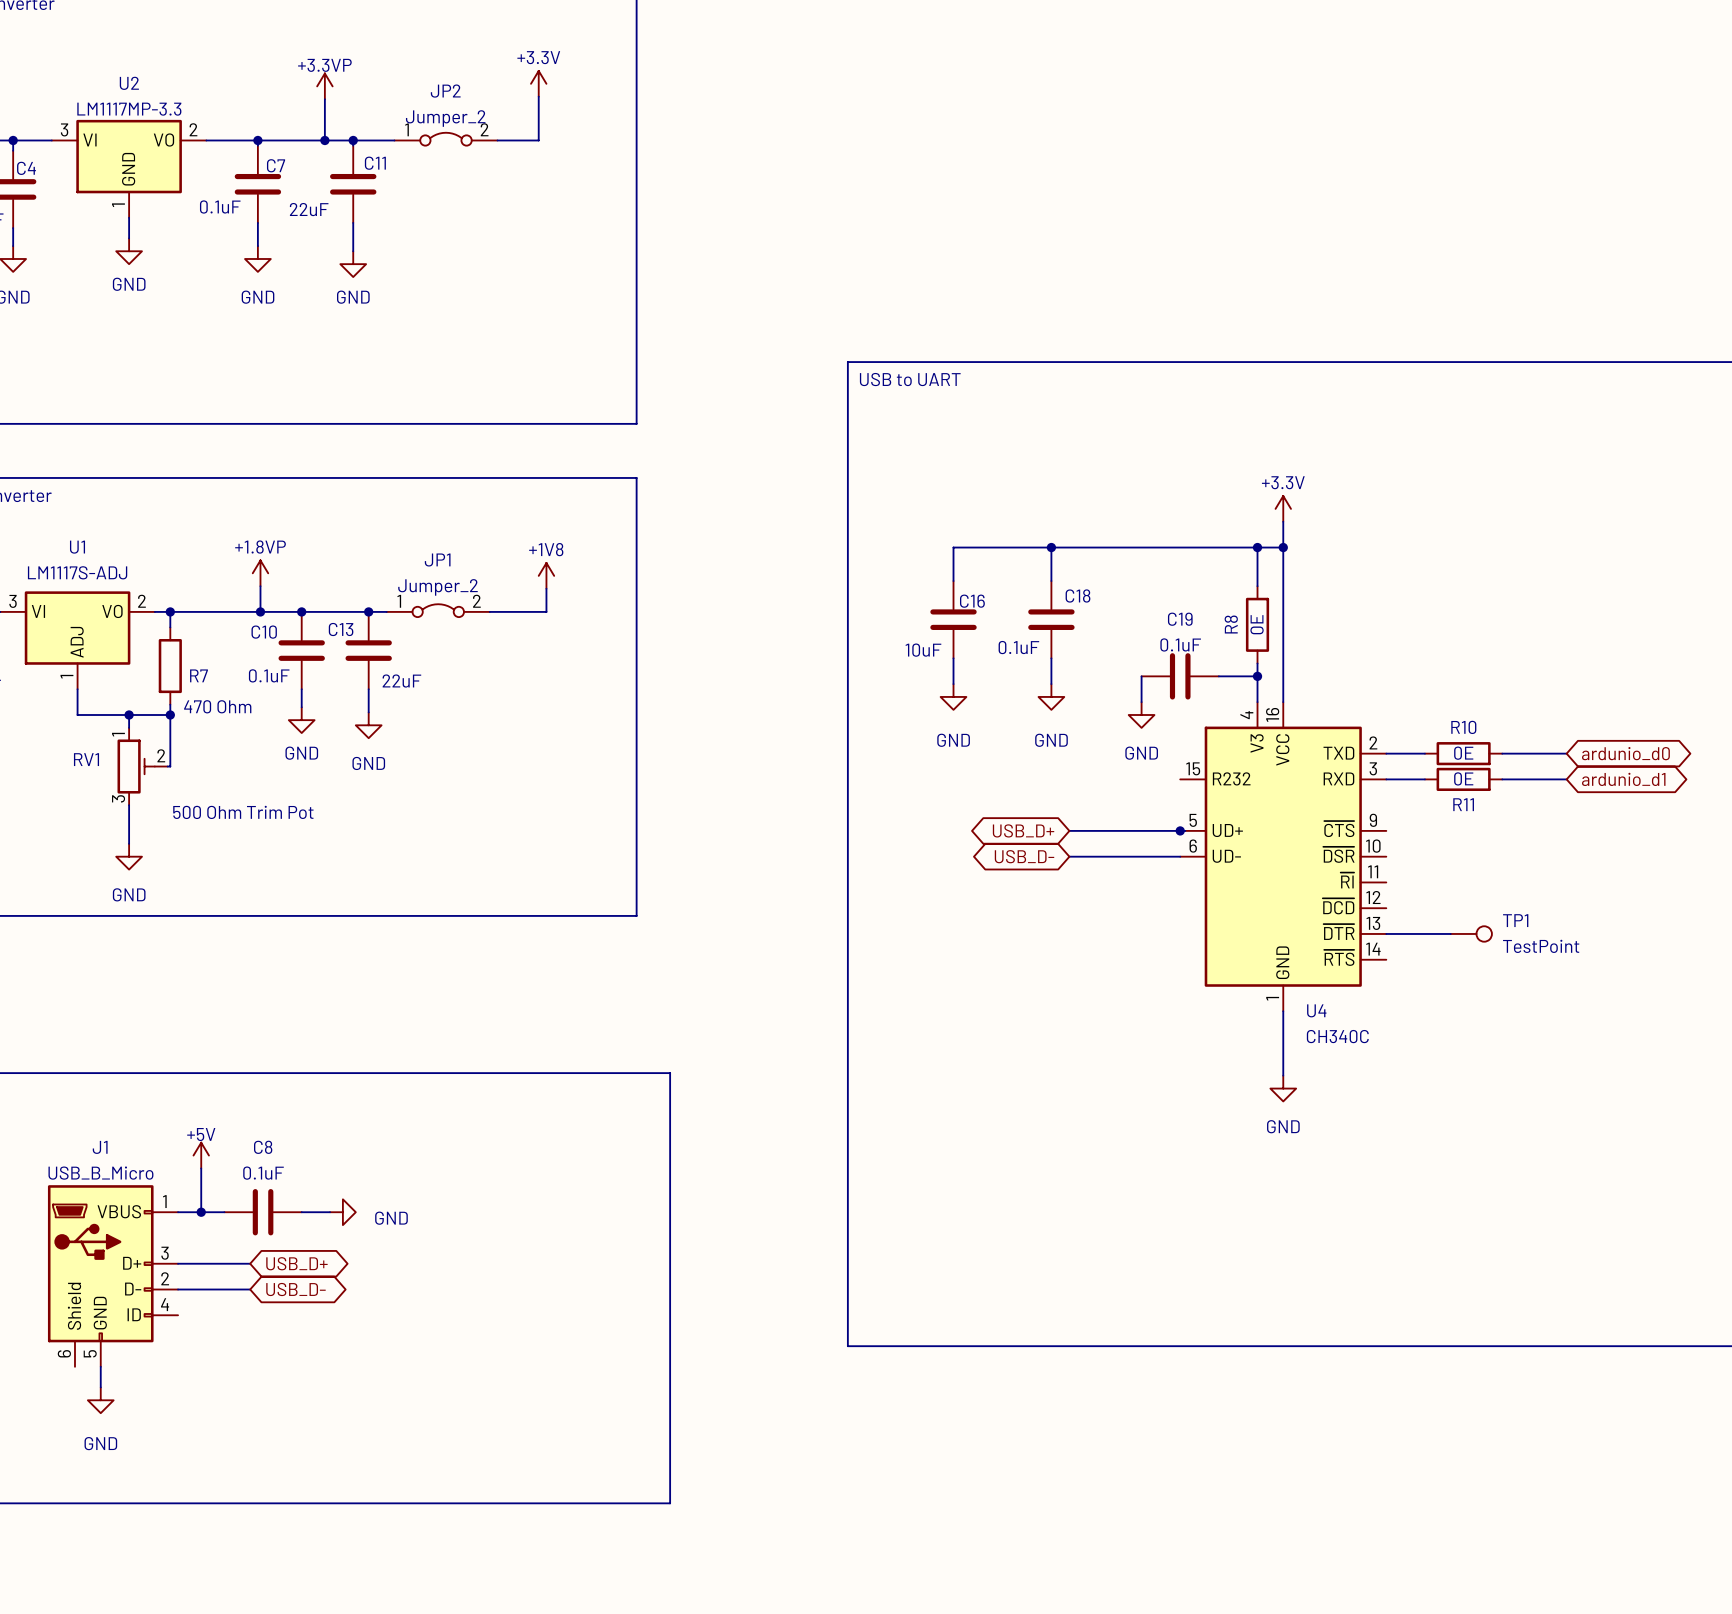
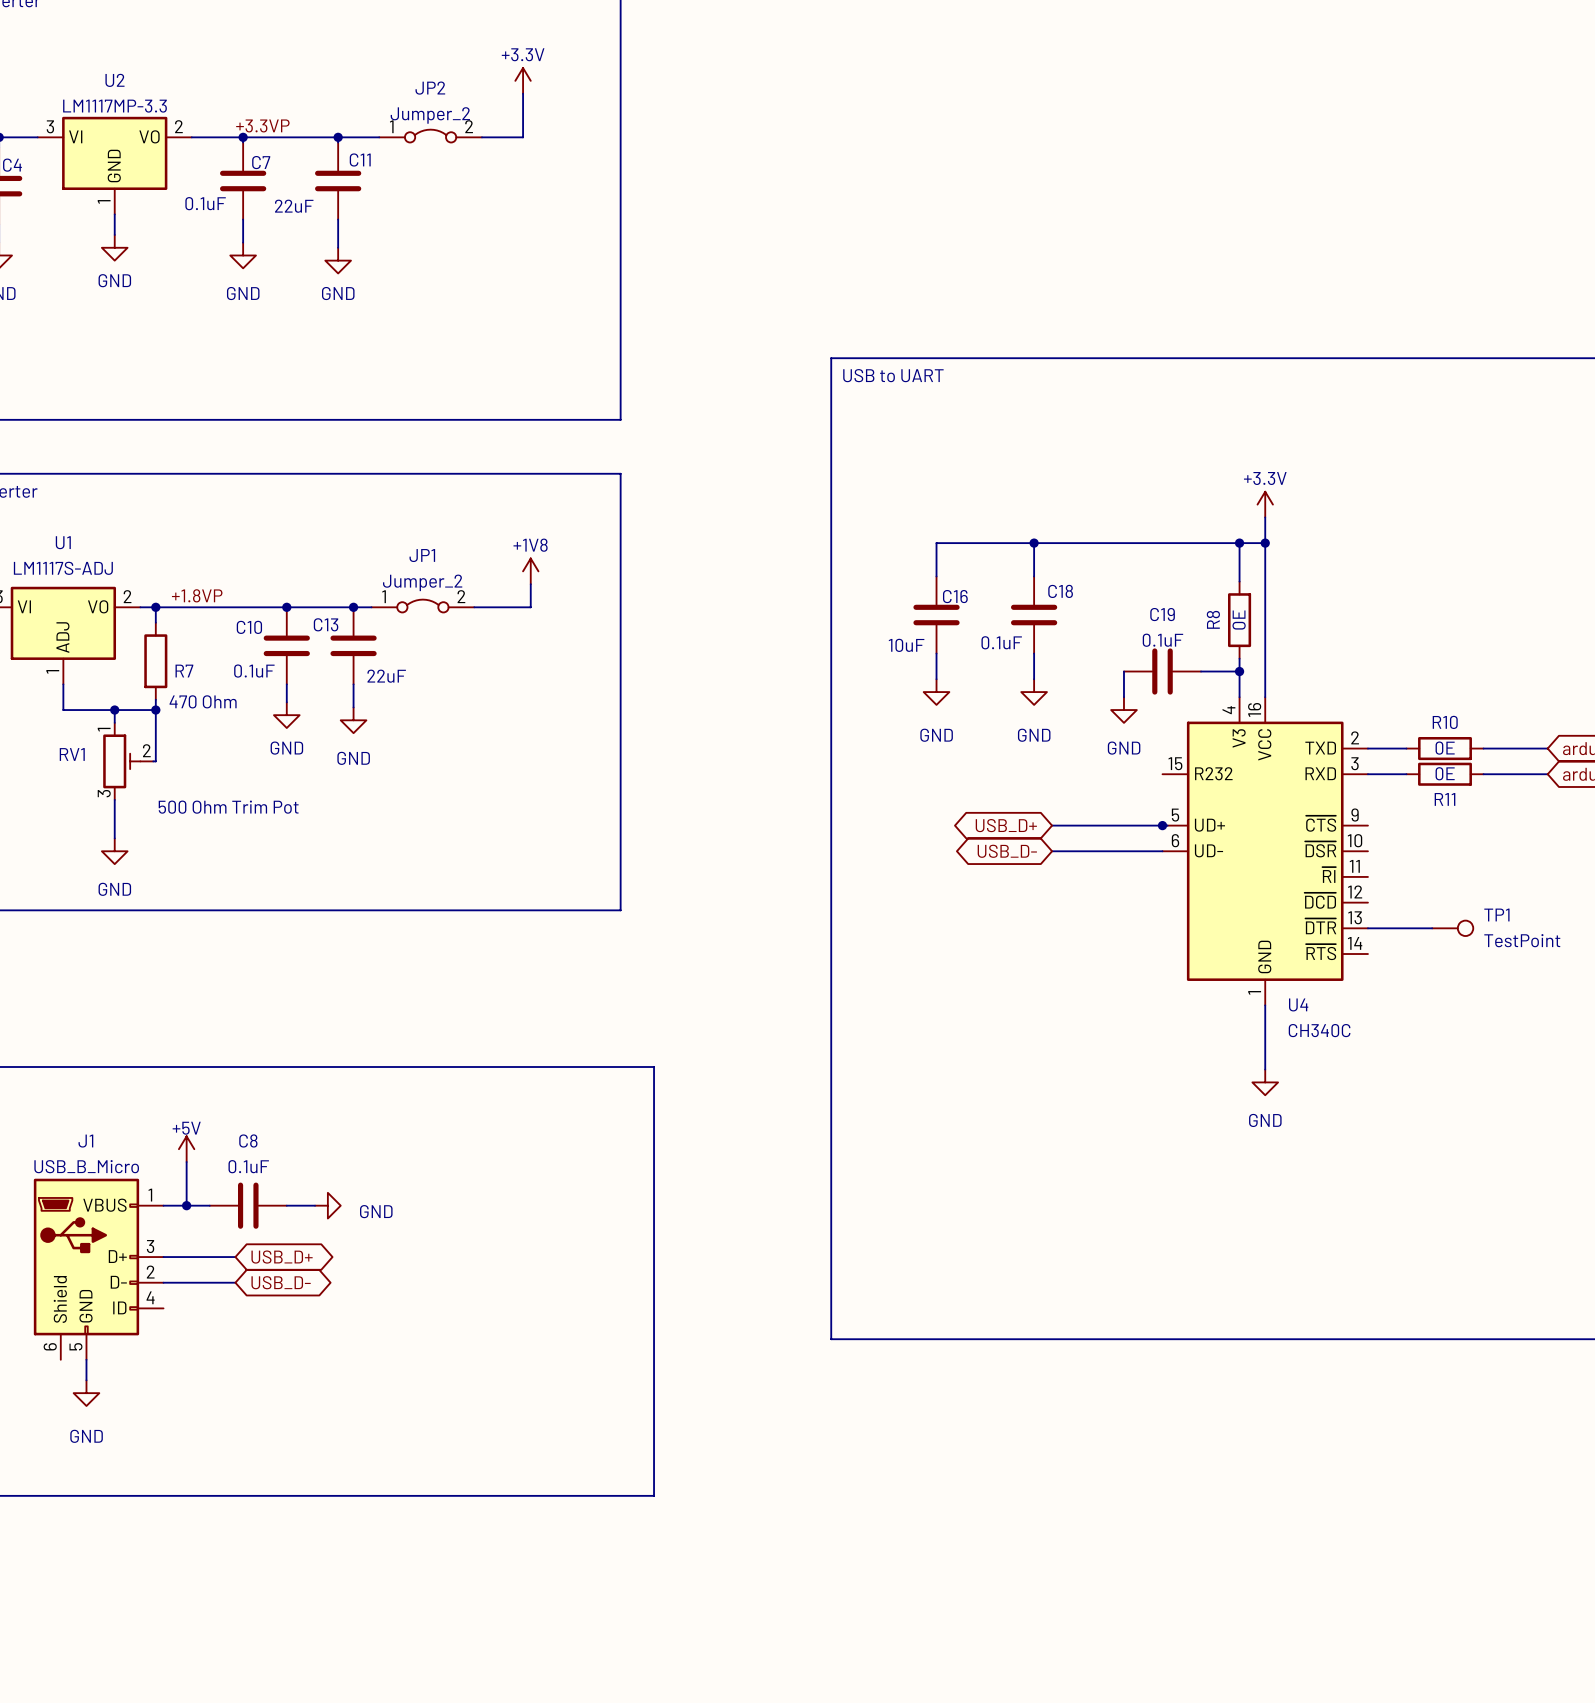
power symbol: +3.3VP (324, 86) -> none
wire: (324, 99) (324, 140) -> none
label: none -> +3.3VP (262, 125)
junction: (324, 140) -> none
power symbol: +1.8VP (260, 573) -> none
wire: (260, 586) (260, 611) -> none
label: none -> +1.8VP (197, 595)
junction: (260, 611) -> none

